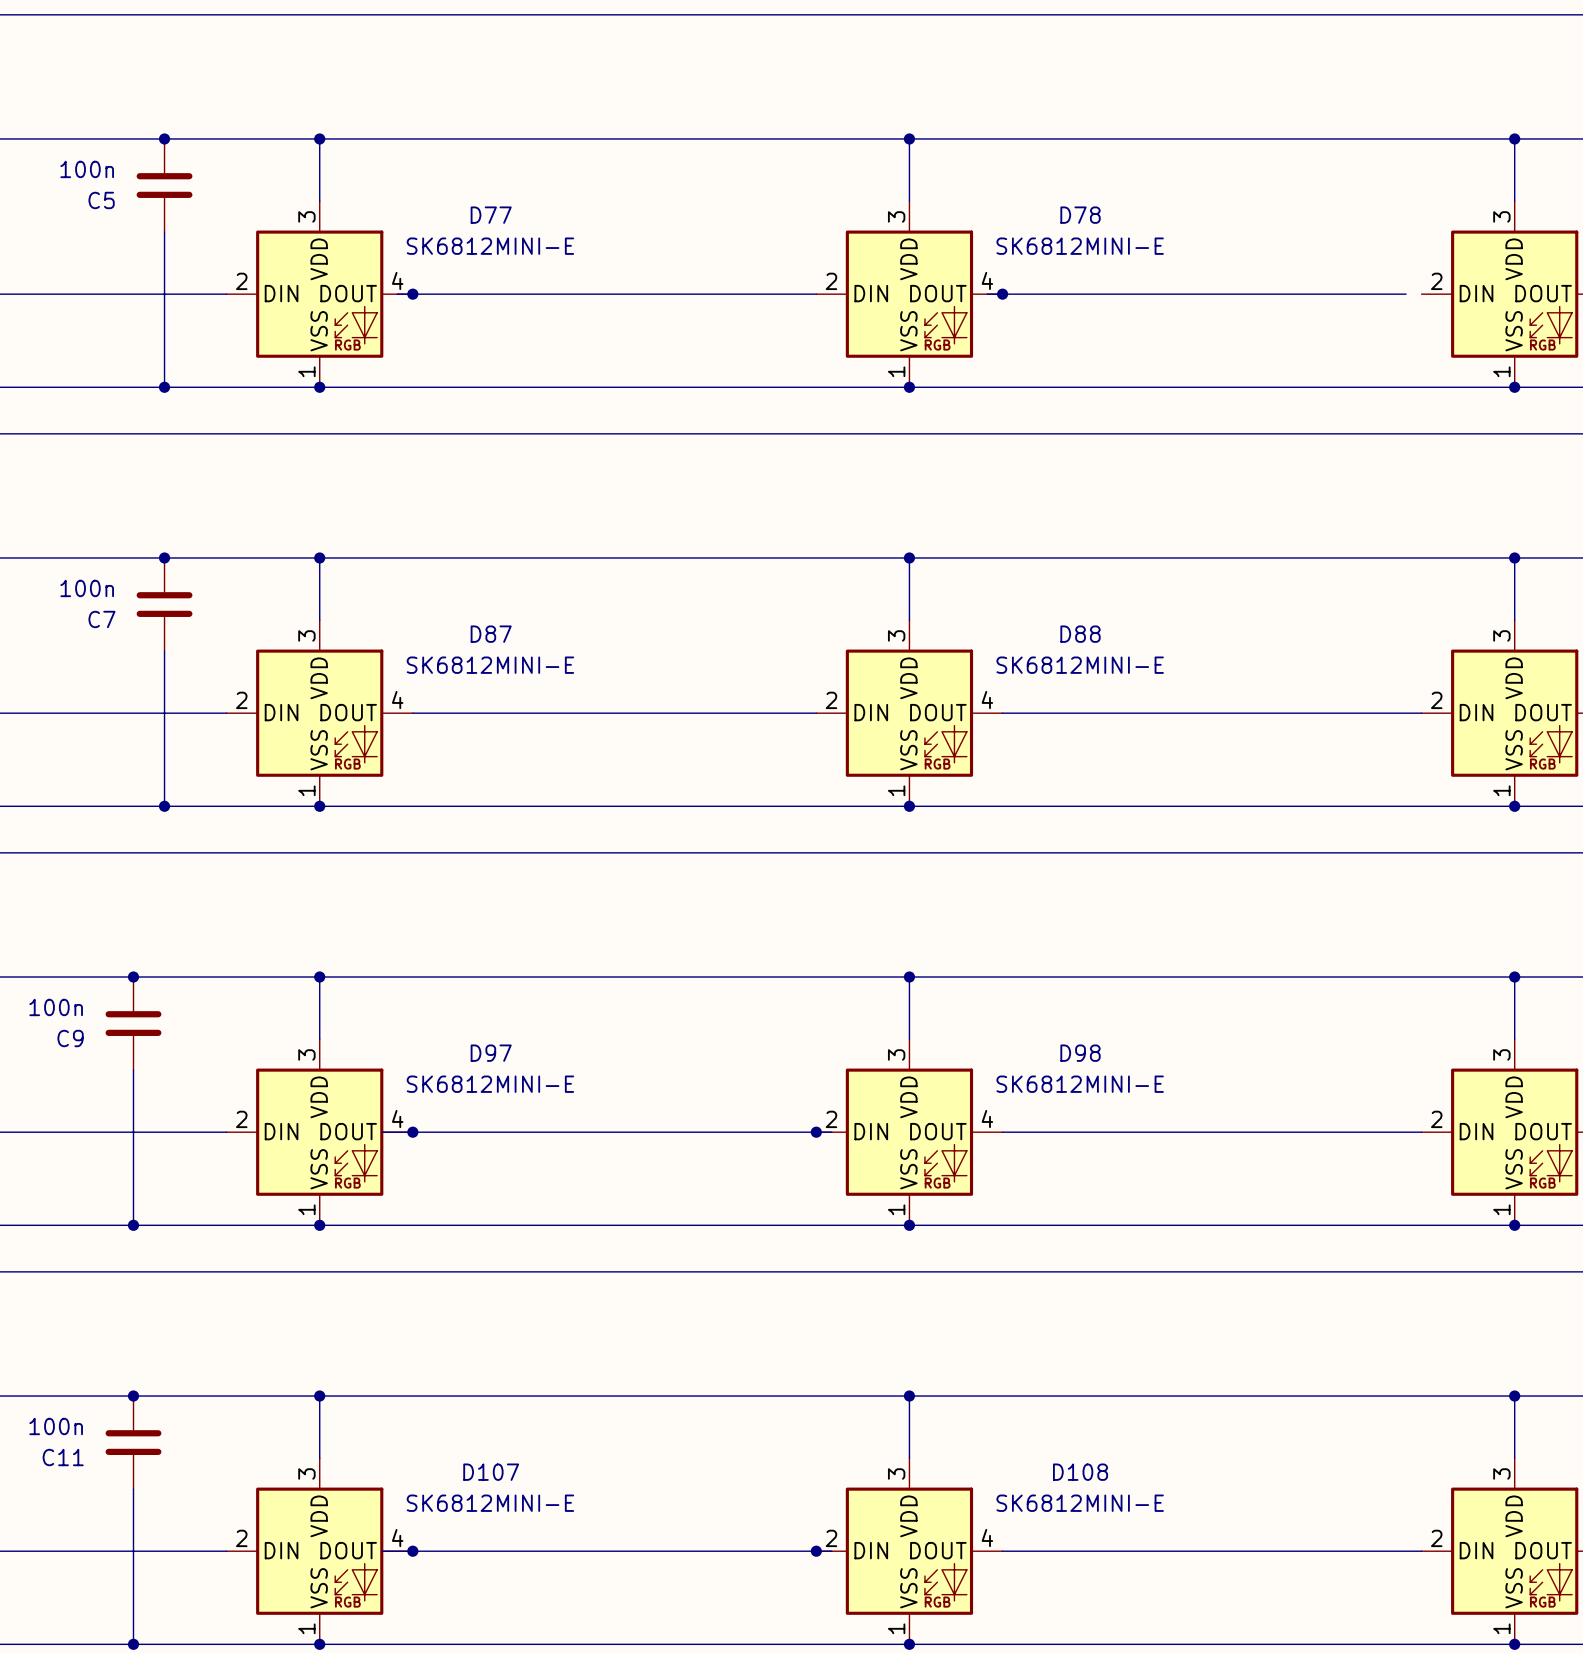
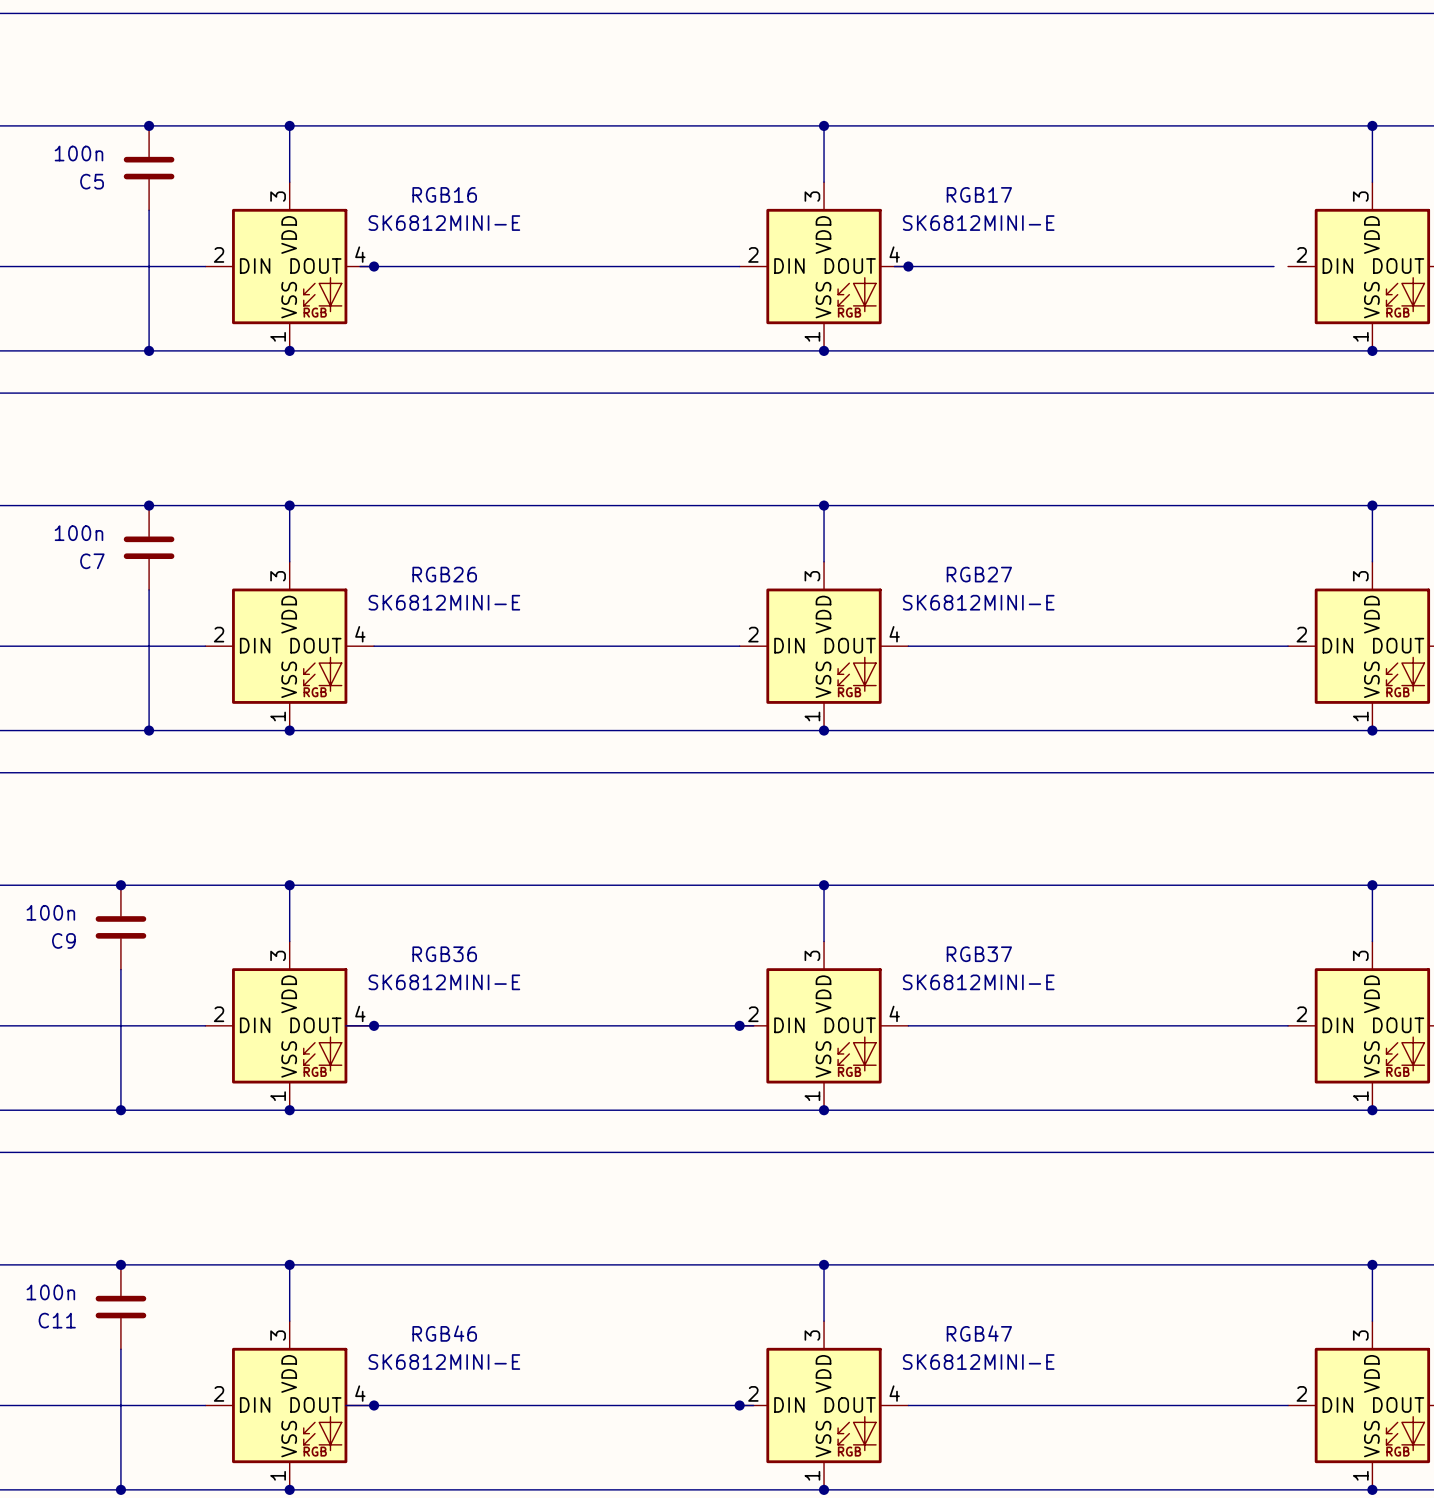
D77 name: D77 (491, 215) -> RGB16 (444, 194)
D78 name: D78 (1080, 215) -> RGB17 (979, 194)
D87 name: D87 (491, 634) -> RGB26 (444, 574)
D88 name: D88 (1080, 634) -> RGB27 (979, 574)
D97 name: D97 (491, 1053) -> RGB36 (444, 954)
D98 name: D98 (1080, 1053) -> RGB37 (979, 954)
D107 name: D107 (491, 1472) -> RGB46 (444, 1333)
D108 name: D108 (1080, 1472) -> RGB47 (979, 1333)

